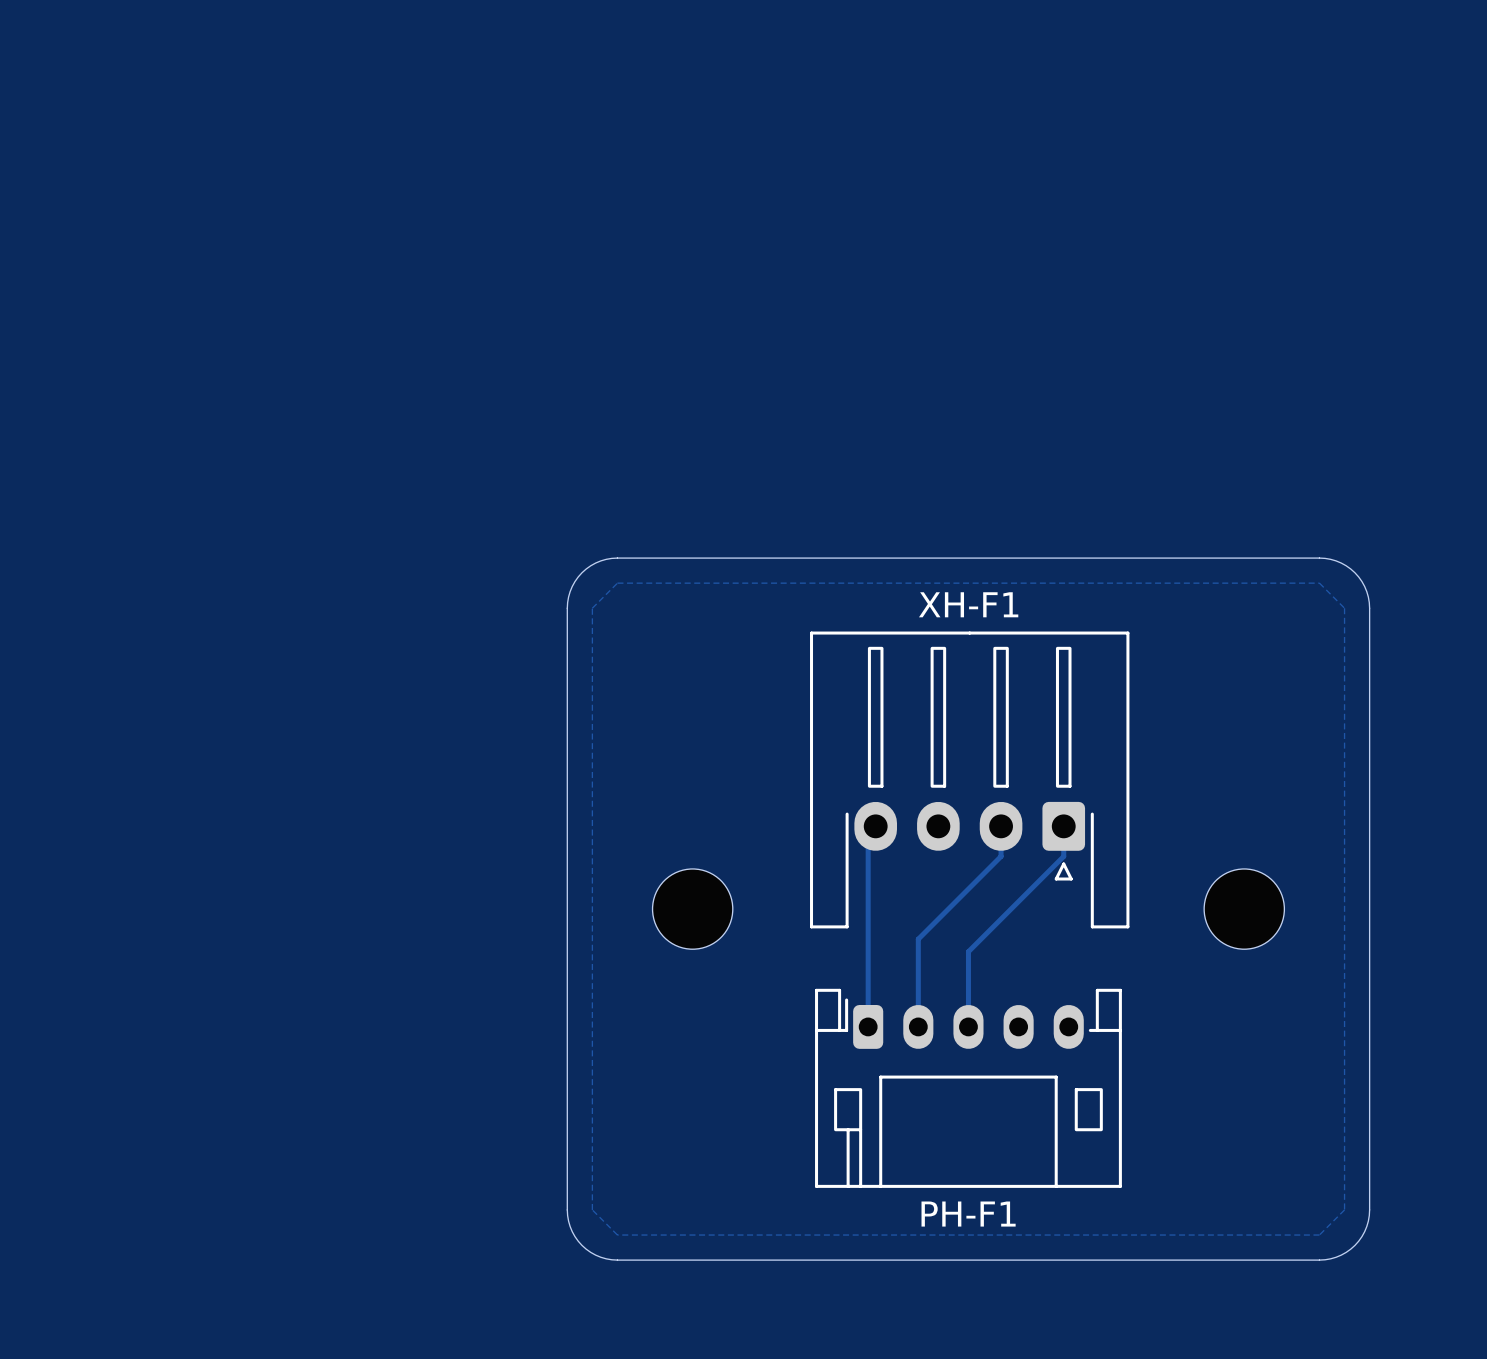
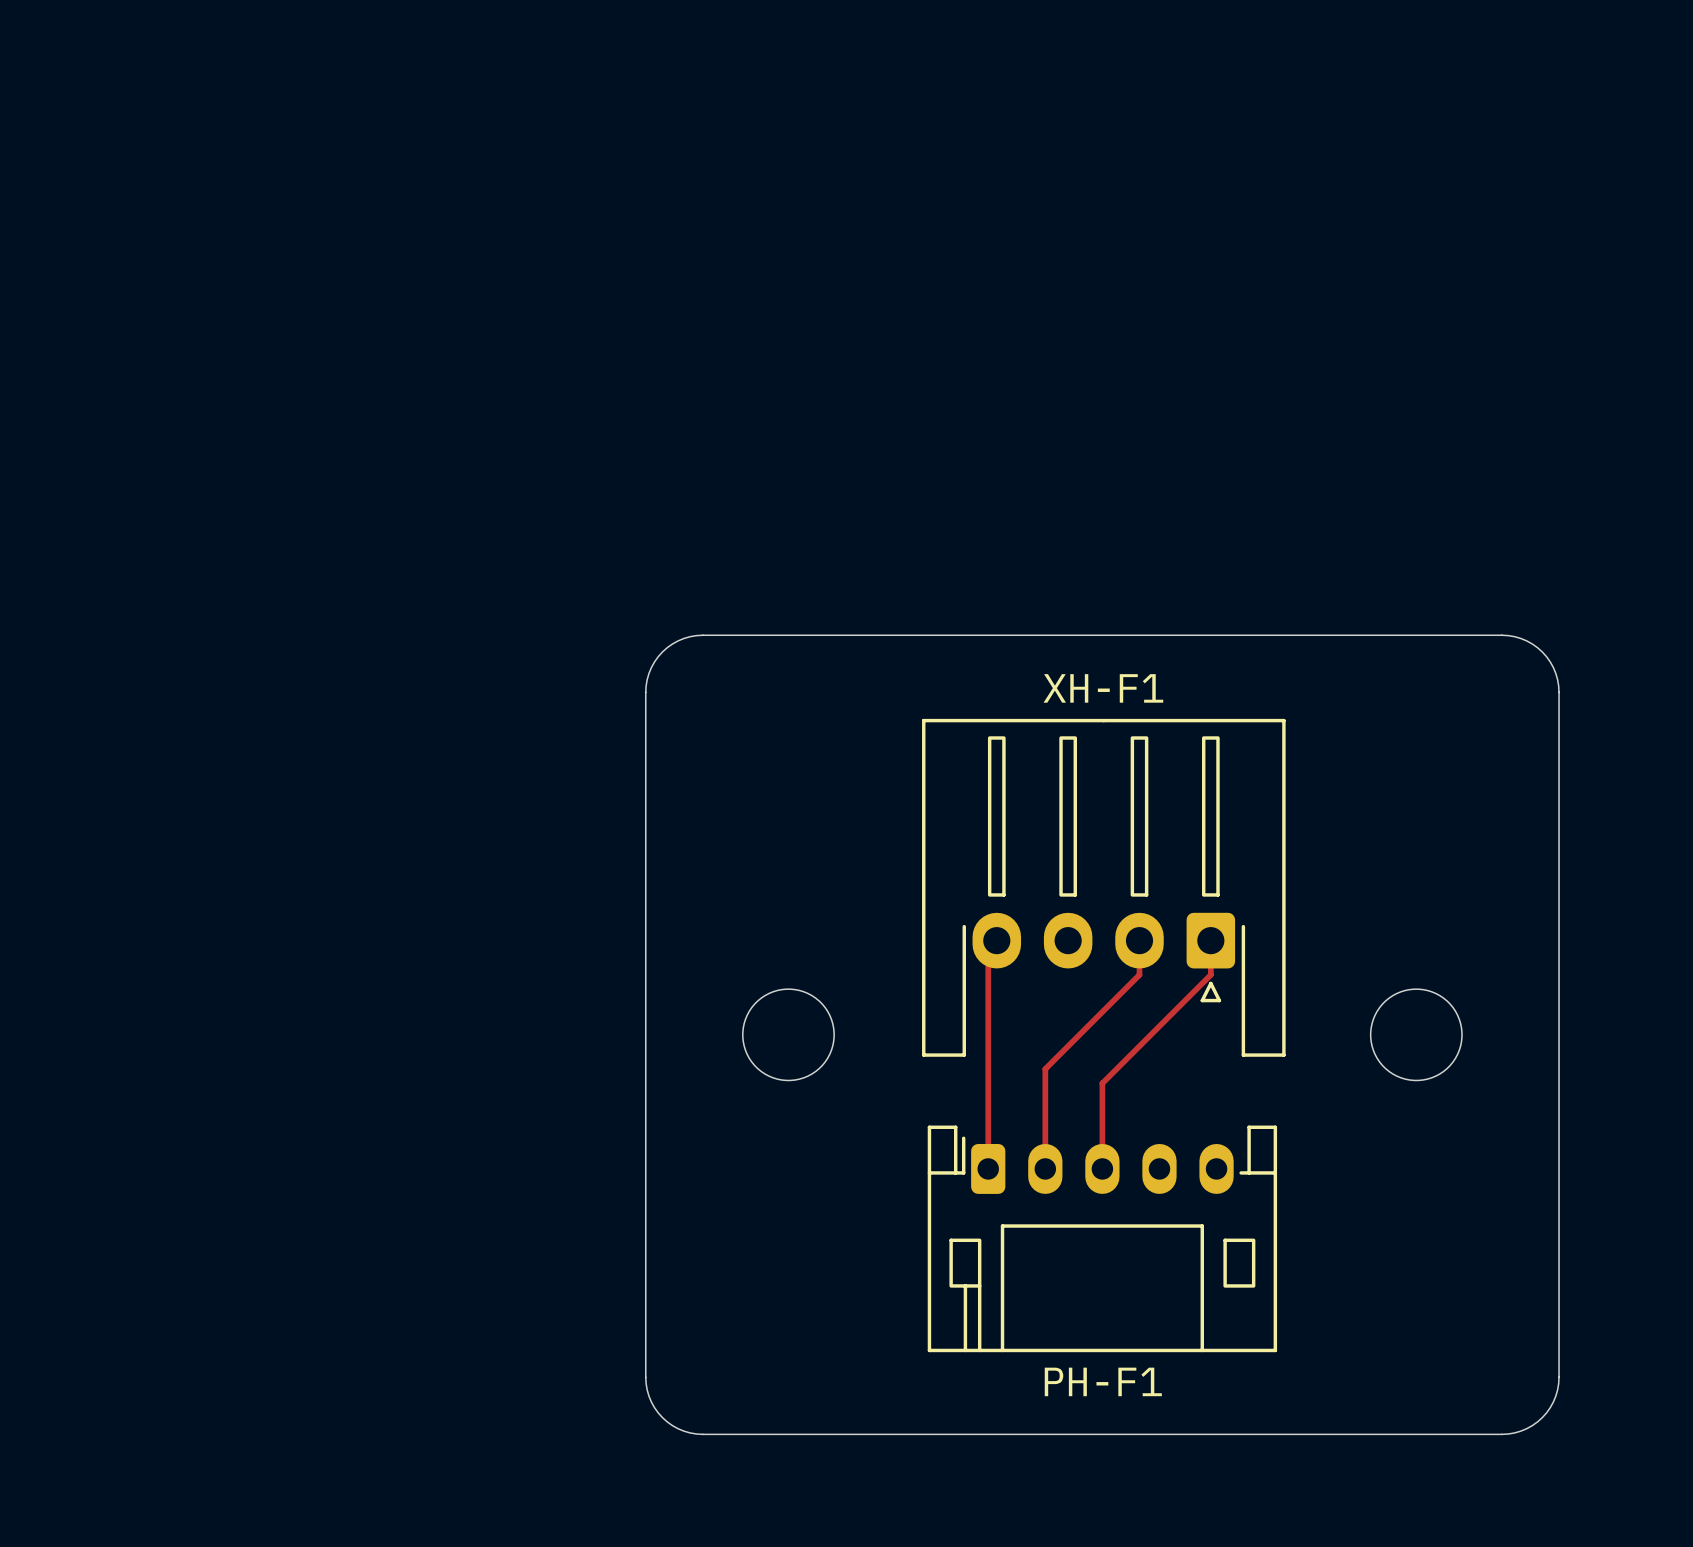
zone outline: (617, 583) (1319, 583) (1344, 608) (1344, 1209) (1319, 1235) (617, 1235) (592, 1209) (592, 608) (617, 583) -> none

